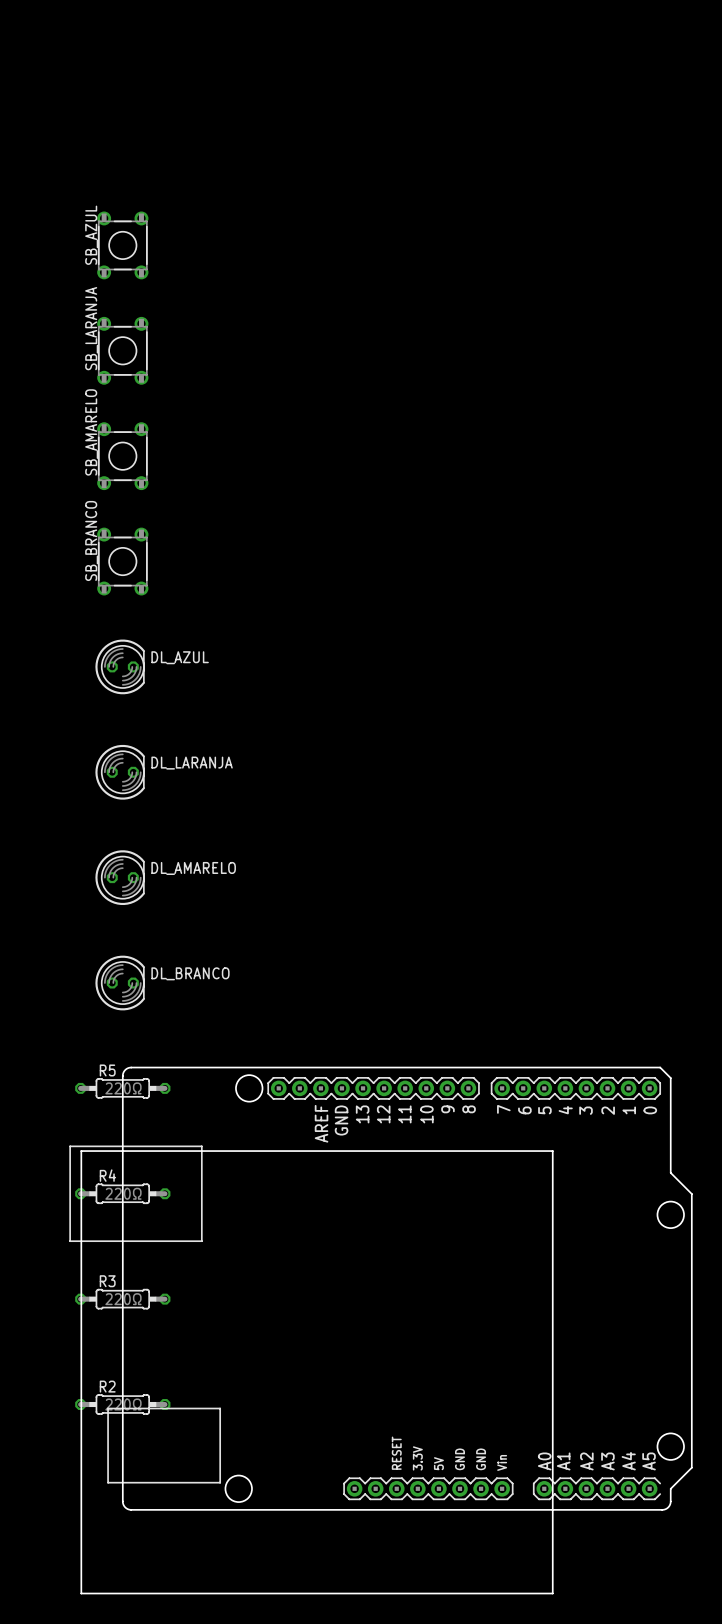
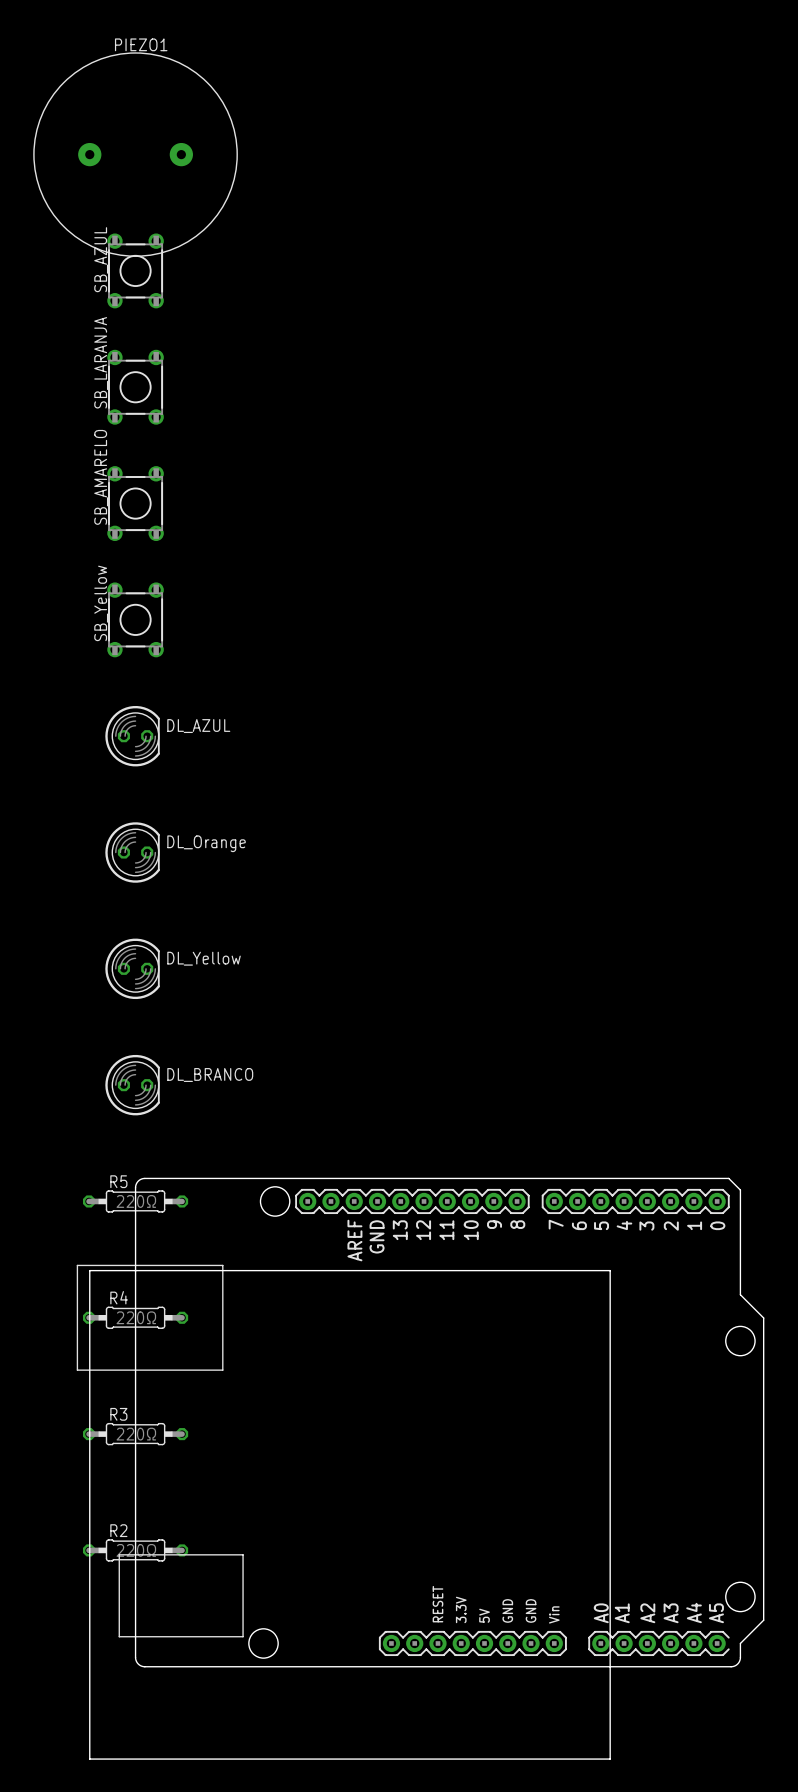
PIEZO1: none -> (135, 154)
SB_BRANCO name: SB_BRANCO (91, 540) -> SB_Yellow (101, 603)
DL_LARANJA name: DL_LARANJA (192, 763) -> DL_Orange (206, 843)
DL_AMARELO name: DL_AMARELO (193, 868) -> DL_Yellow (204, 958)

